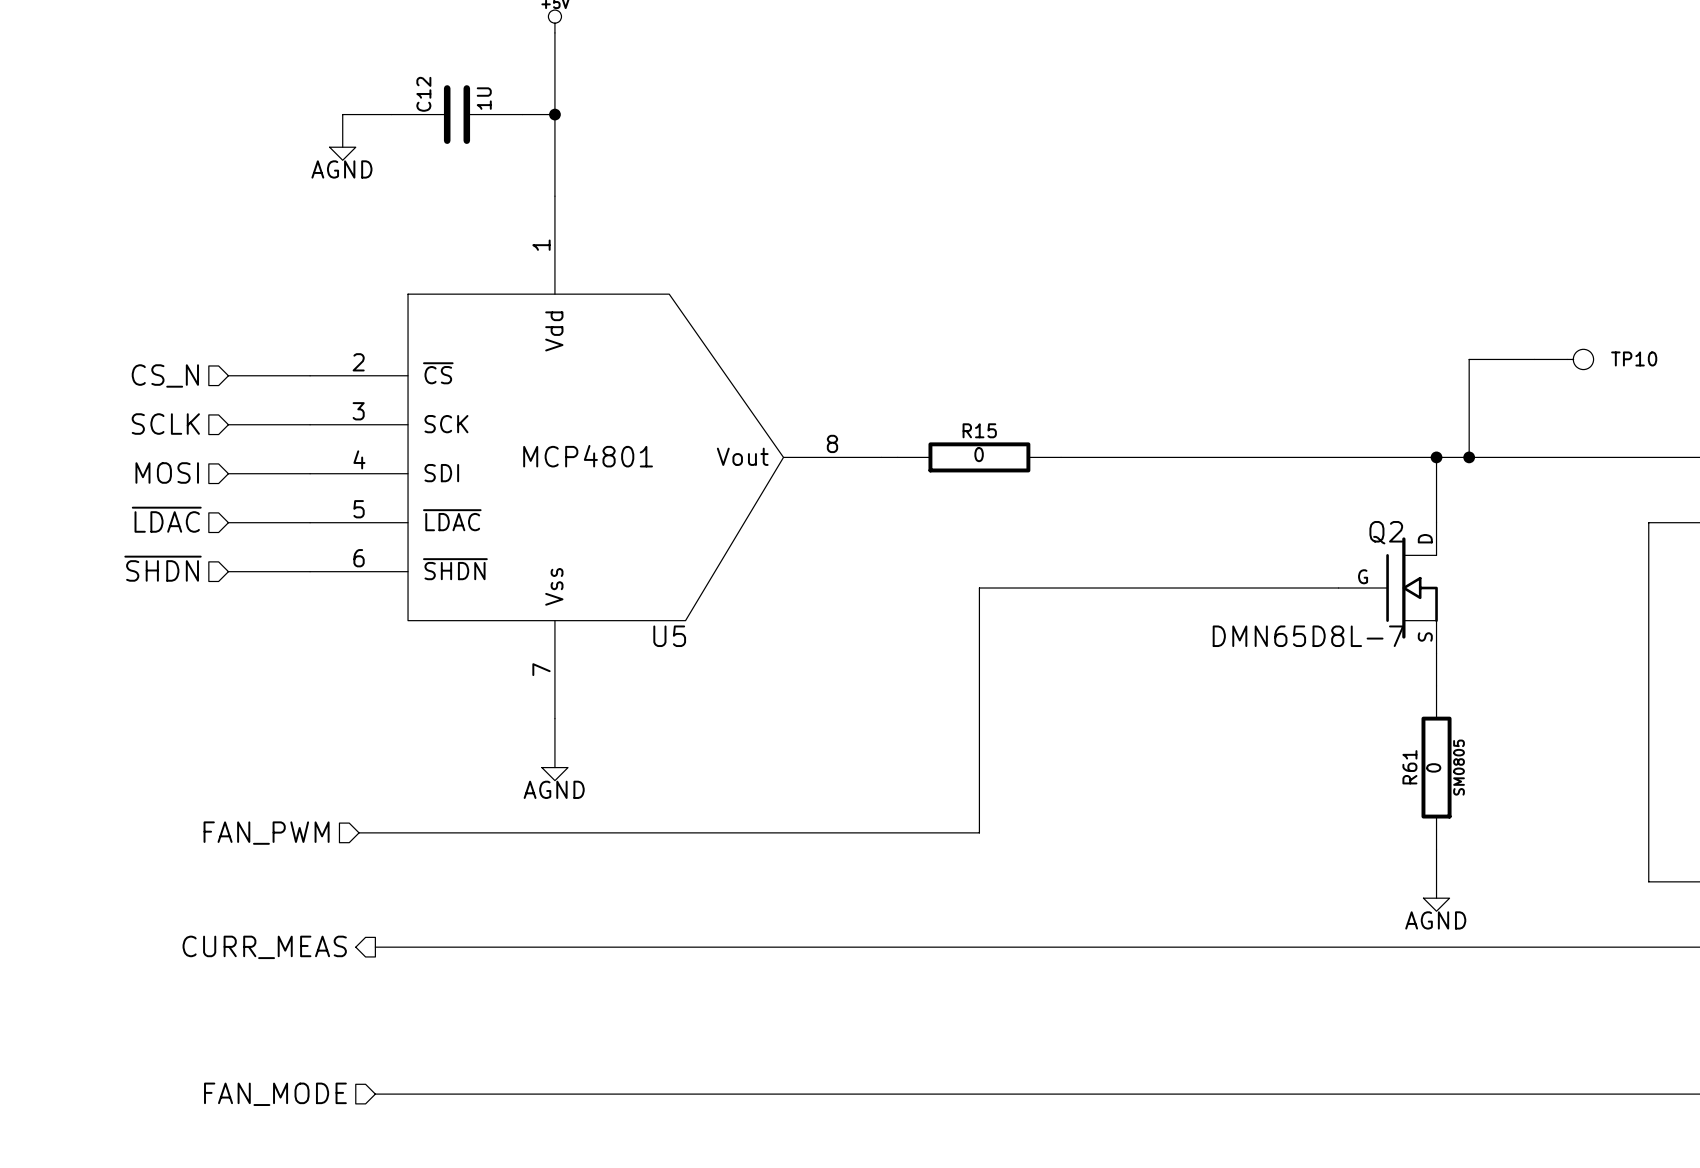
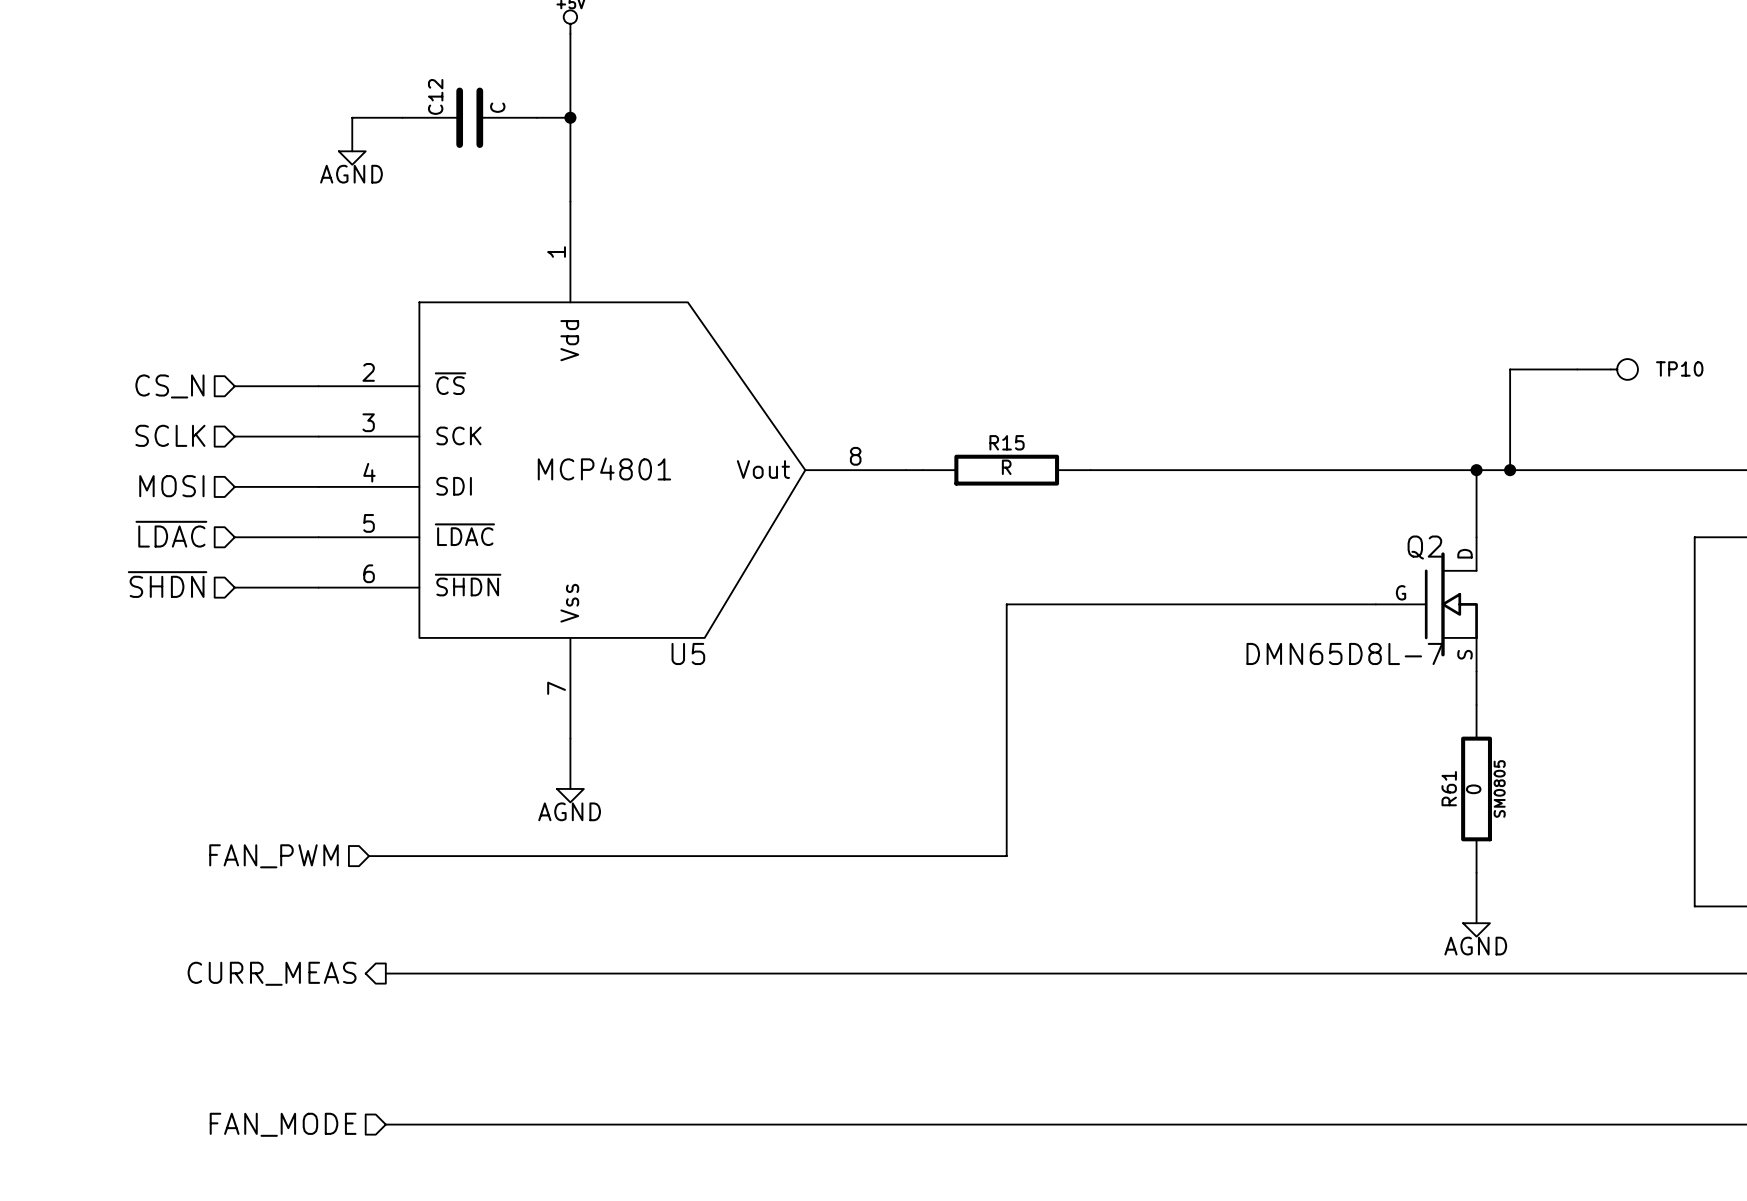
C12 value: 1U (484, 98) -> C (497, 107)
R15 value: 0 (979, 454) -> R (1006, 467)

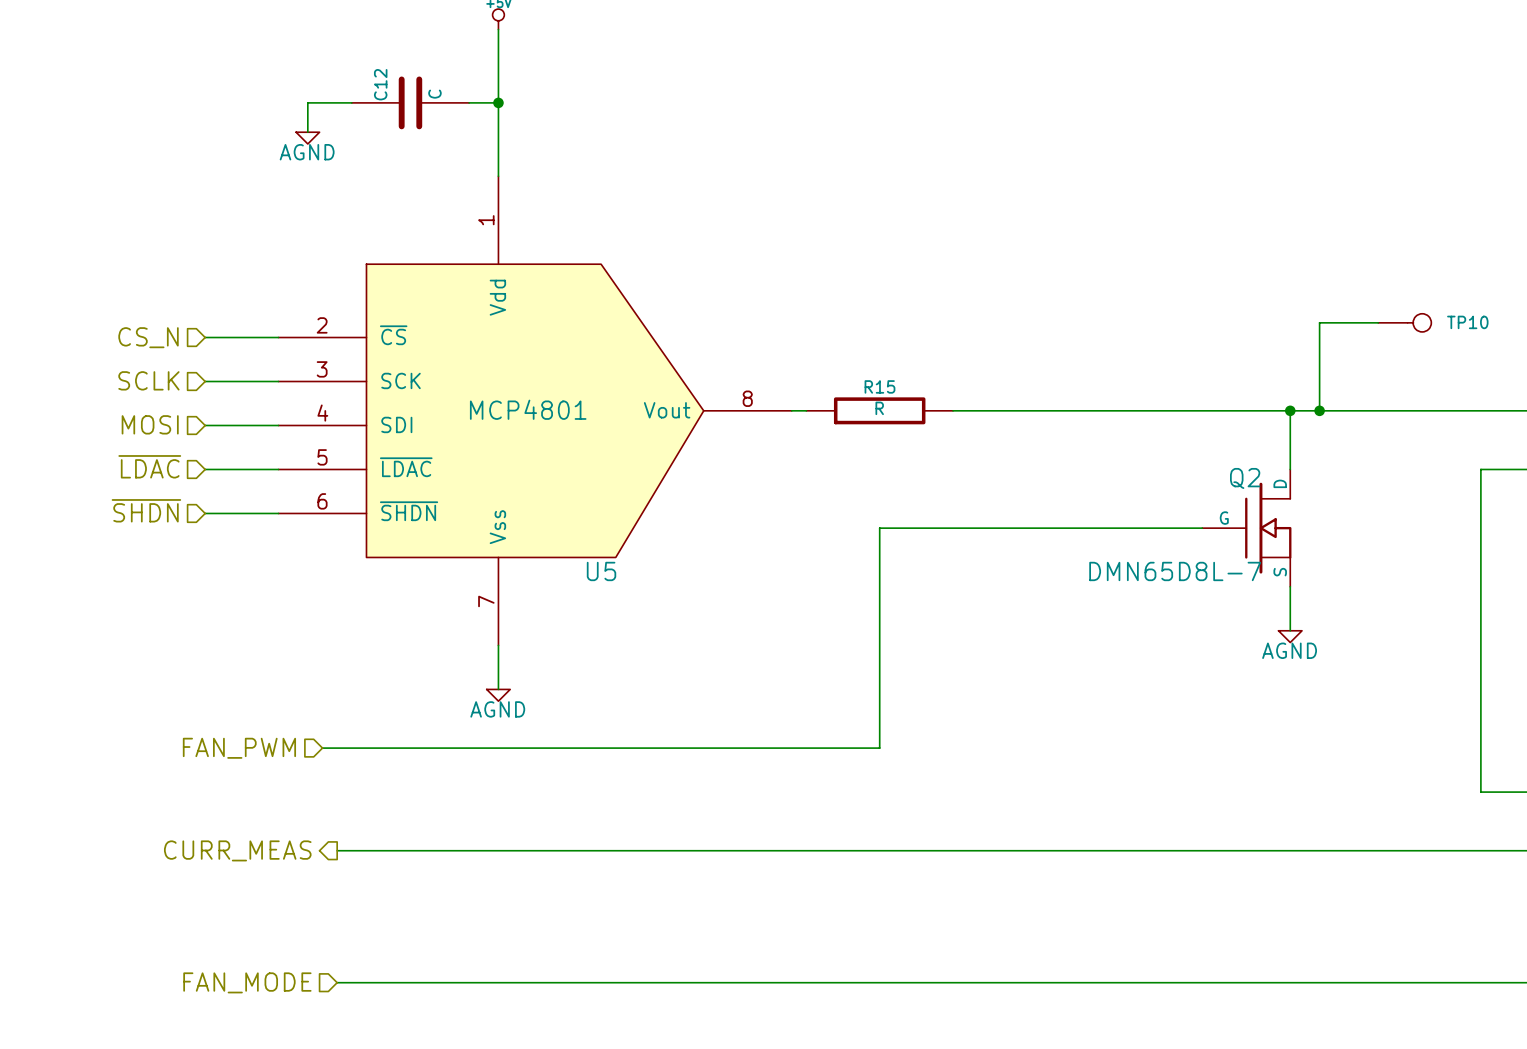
R61: 0 (1476, 788) -> none
wire: (1476, 872) (1476, 923) -> none
power symbol position: AGND (1476, 929) -> AGND (1290, 636)

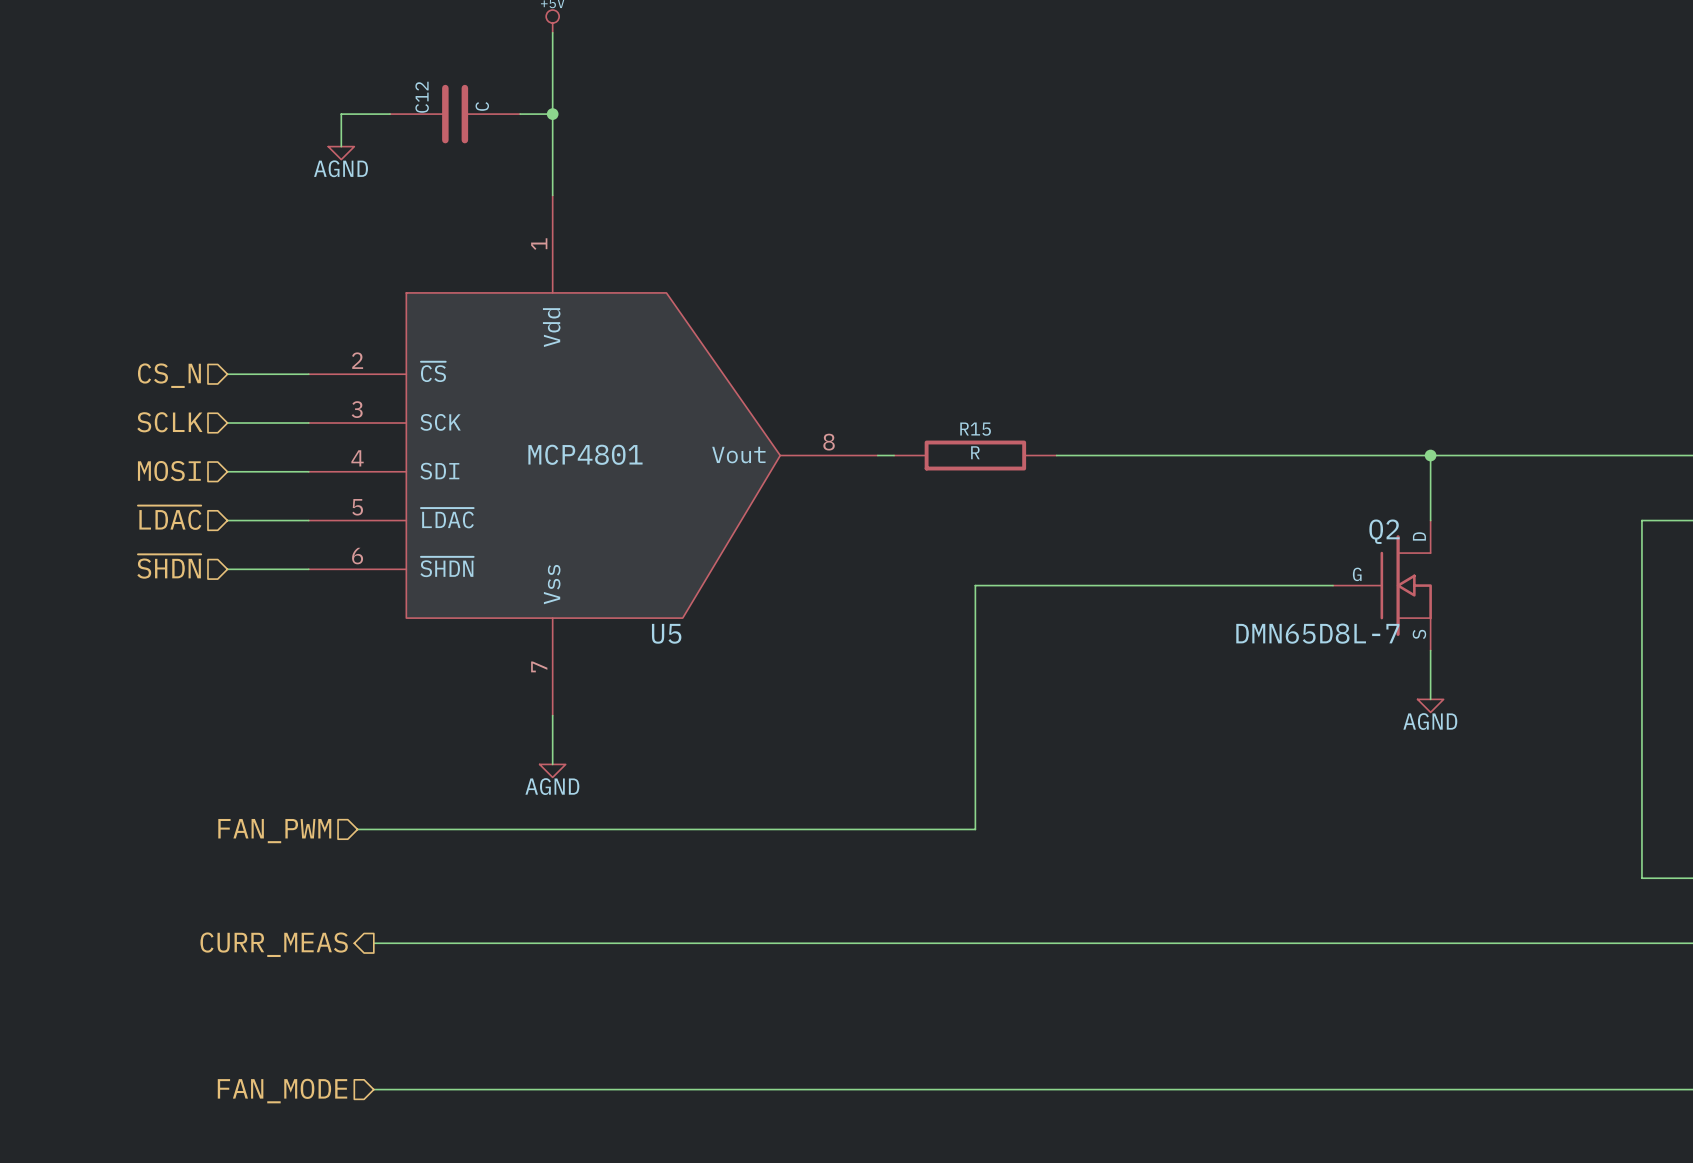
wire: (1378, 322) (1319, 322) (1319, 410) -> none
TP10: (1404, 322) -> none
junction: (1319, 410) -> none

